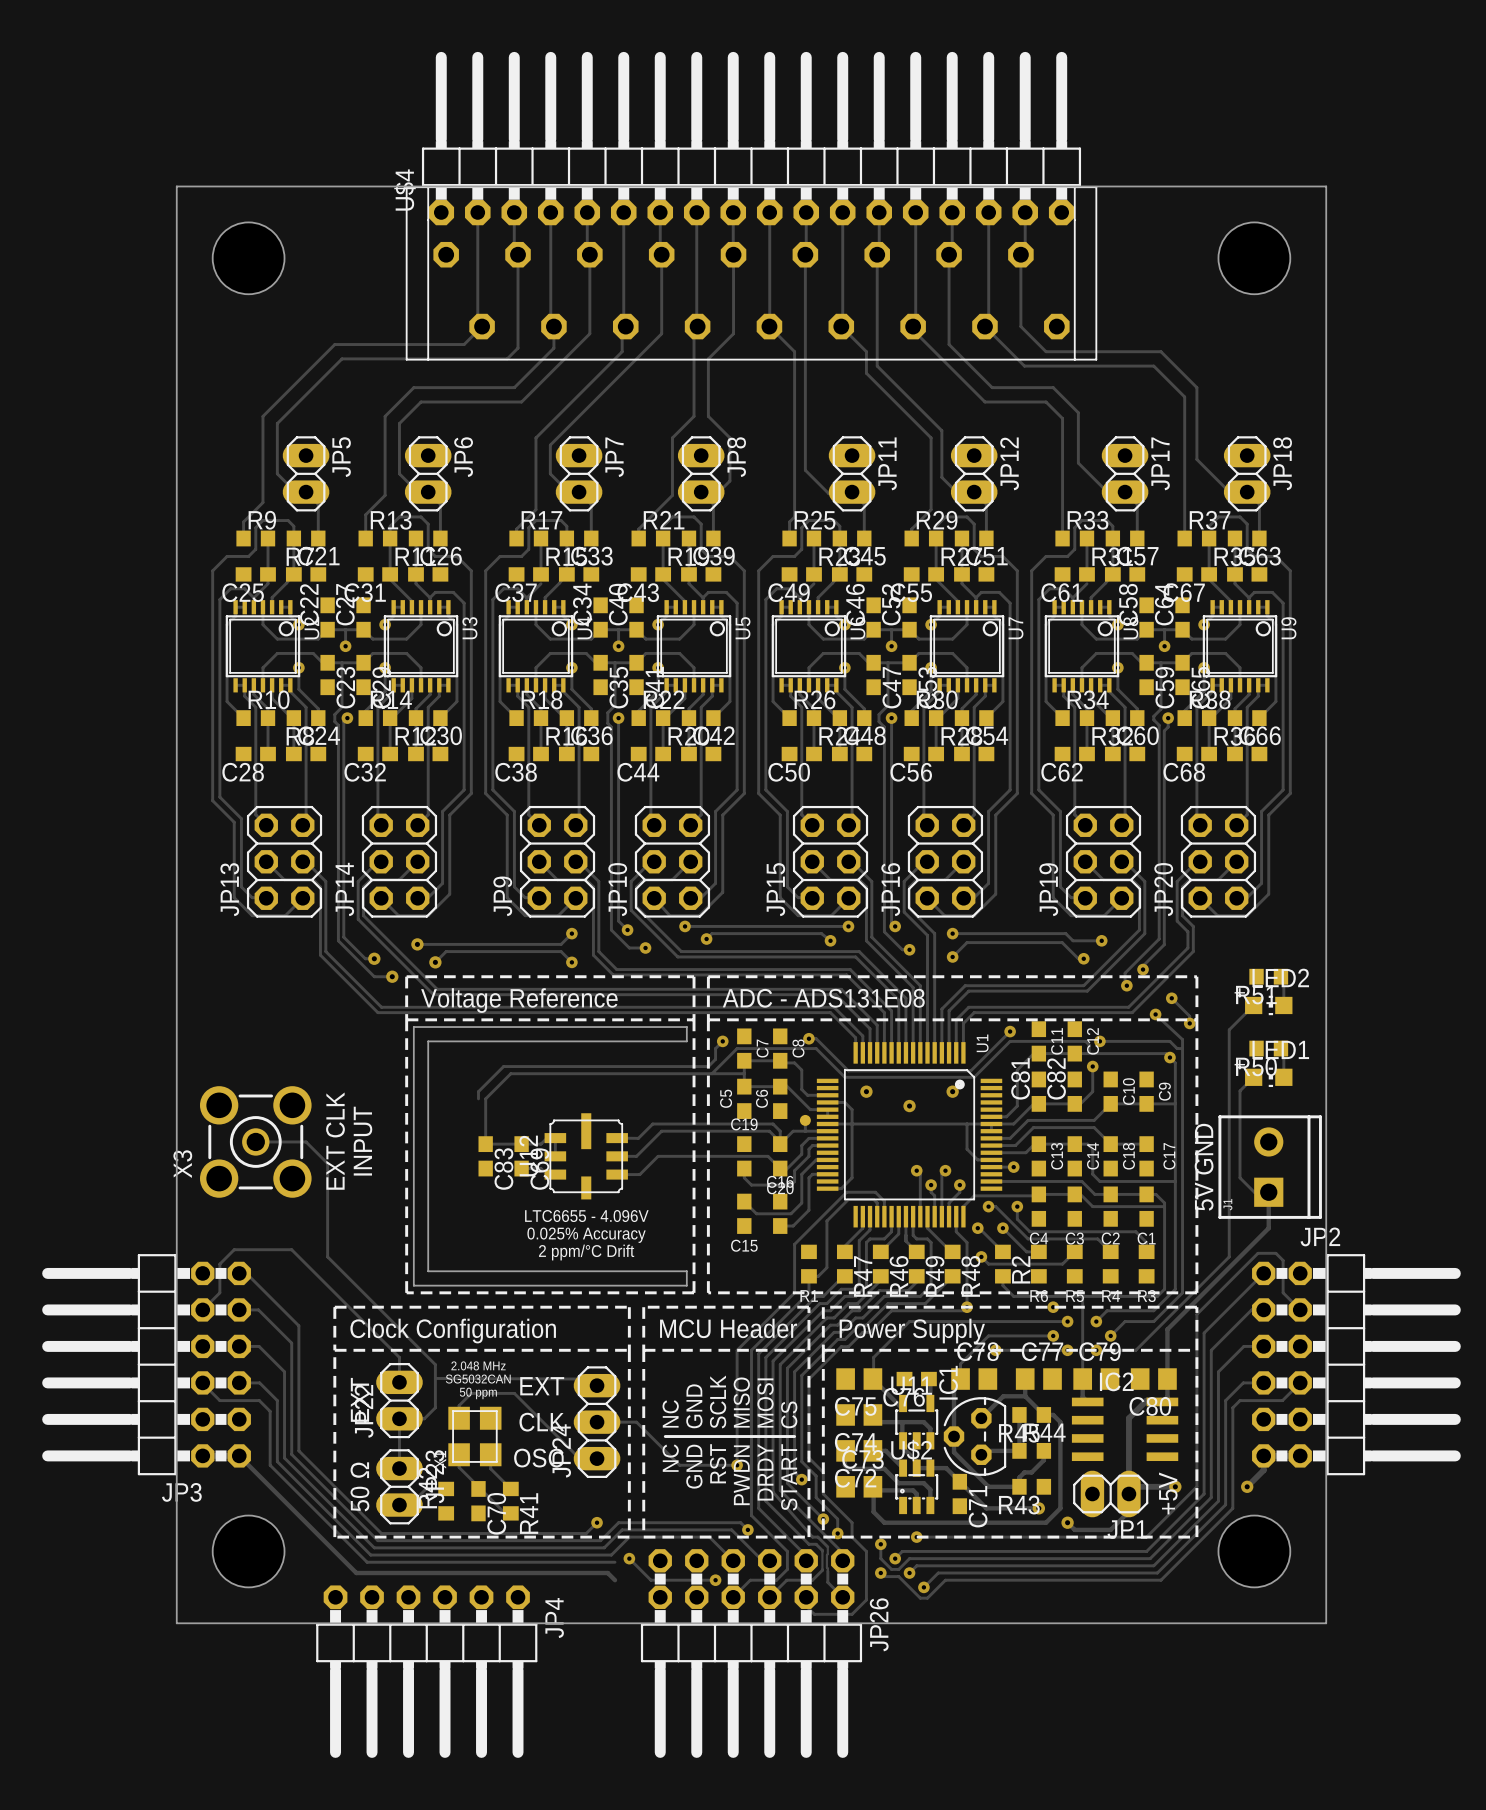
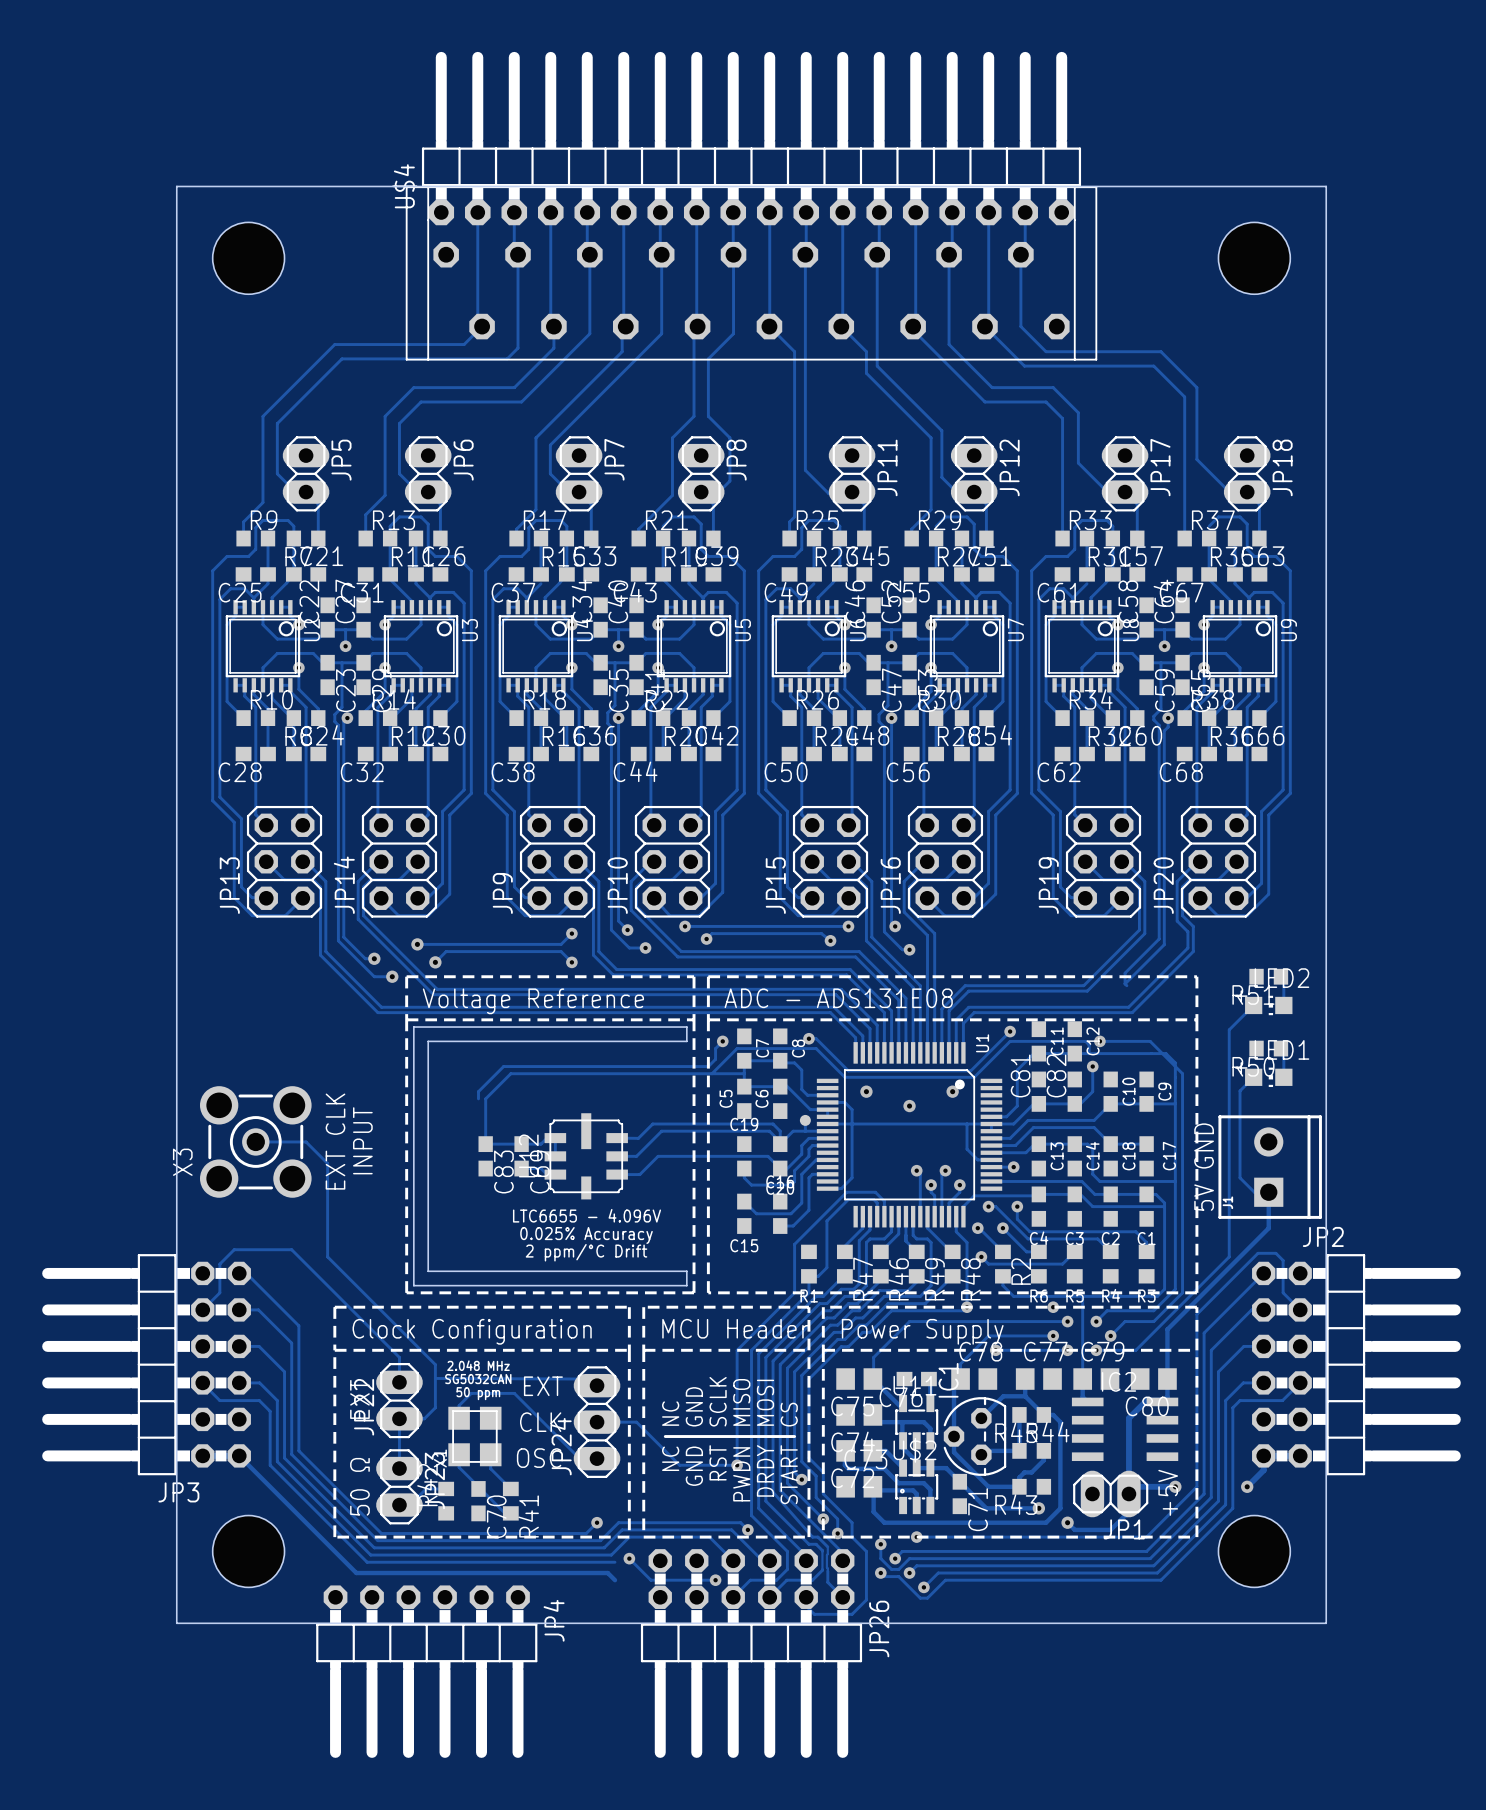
track: (952, 933) (1065, 933) (1072, 940) (1101, 940) -> none
via: (952, 933) -> none
via: (1101, 940) -> none
track: (1164, 944) (1143, 966) (1143, 969) -> (1164, 944) (1125, 983)
track: (952, 956) (967, 942) (1062, 942) (1078, 958) (1083, 958) -> none
via: (952, 956) -> none
via: (1083, 958) -> none
via: (1143, 969) -> none
via: (1126, 985) -> none
track: (1171, 998) (1189, 1016) (1189, 1023) -> none
via: (1171, 998) -> none
track: (1155, 1014) (1182, 1039) (1182, 1073) -> none
via: (1155, 1014) -> none
via: (1189, 1023) -> none
track: (1150, 1041) (1169, 1041) (1177, 1048) (1182, 1048) -> (1150, 1041) (1182, 1073)
via: (1169, 1057) -> none

